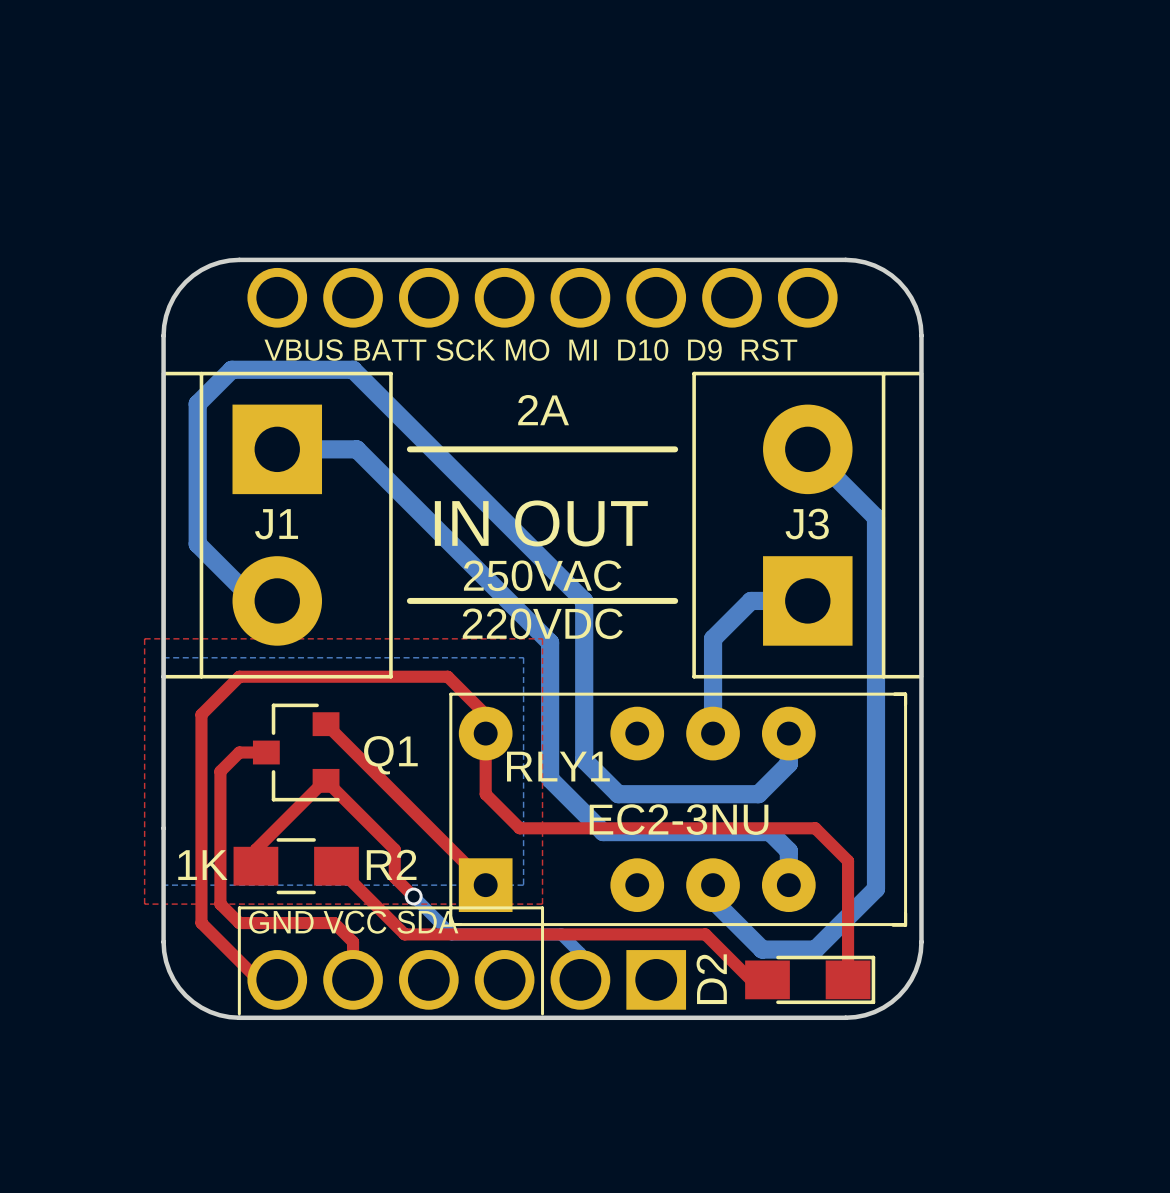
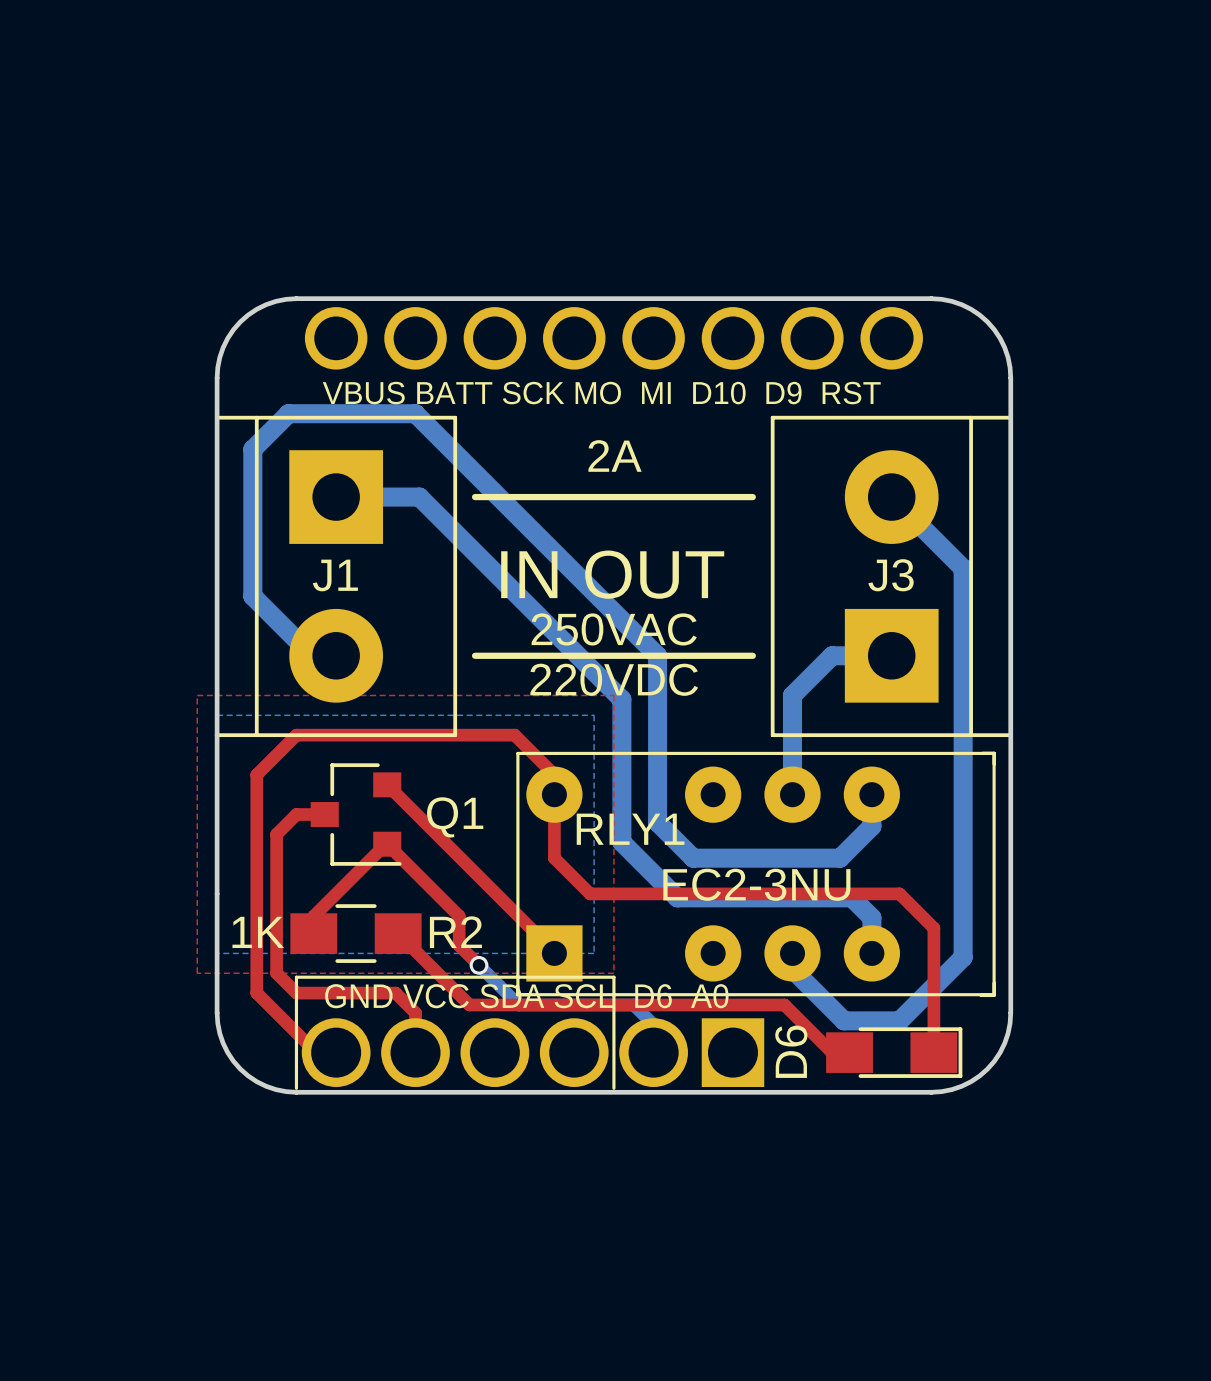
part footprint: [237, 906, 687, 1016] -> [294, 975, 765, 1090]
D2 name: D2 (711, 979) -> D6 (791, 1051)

